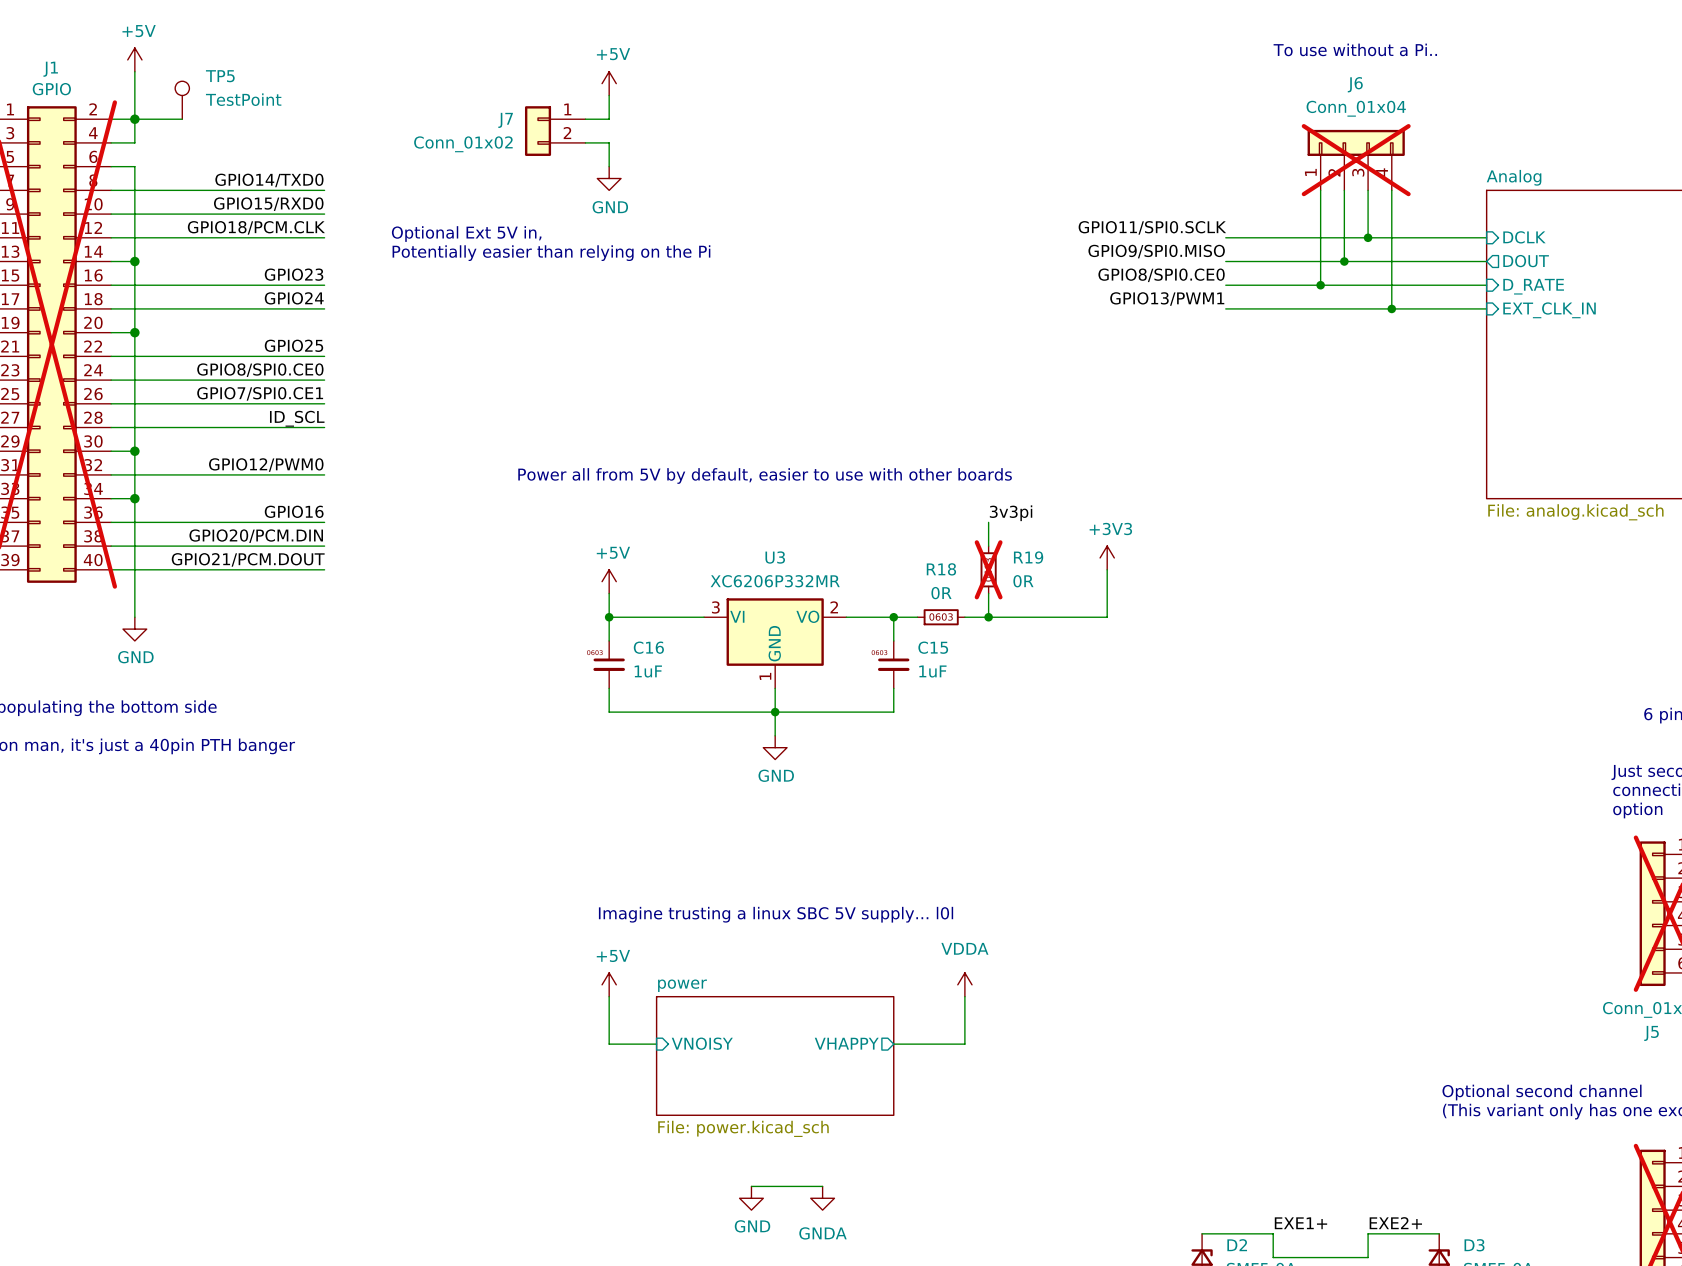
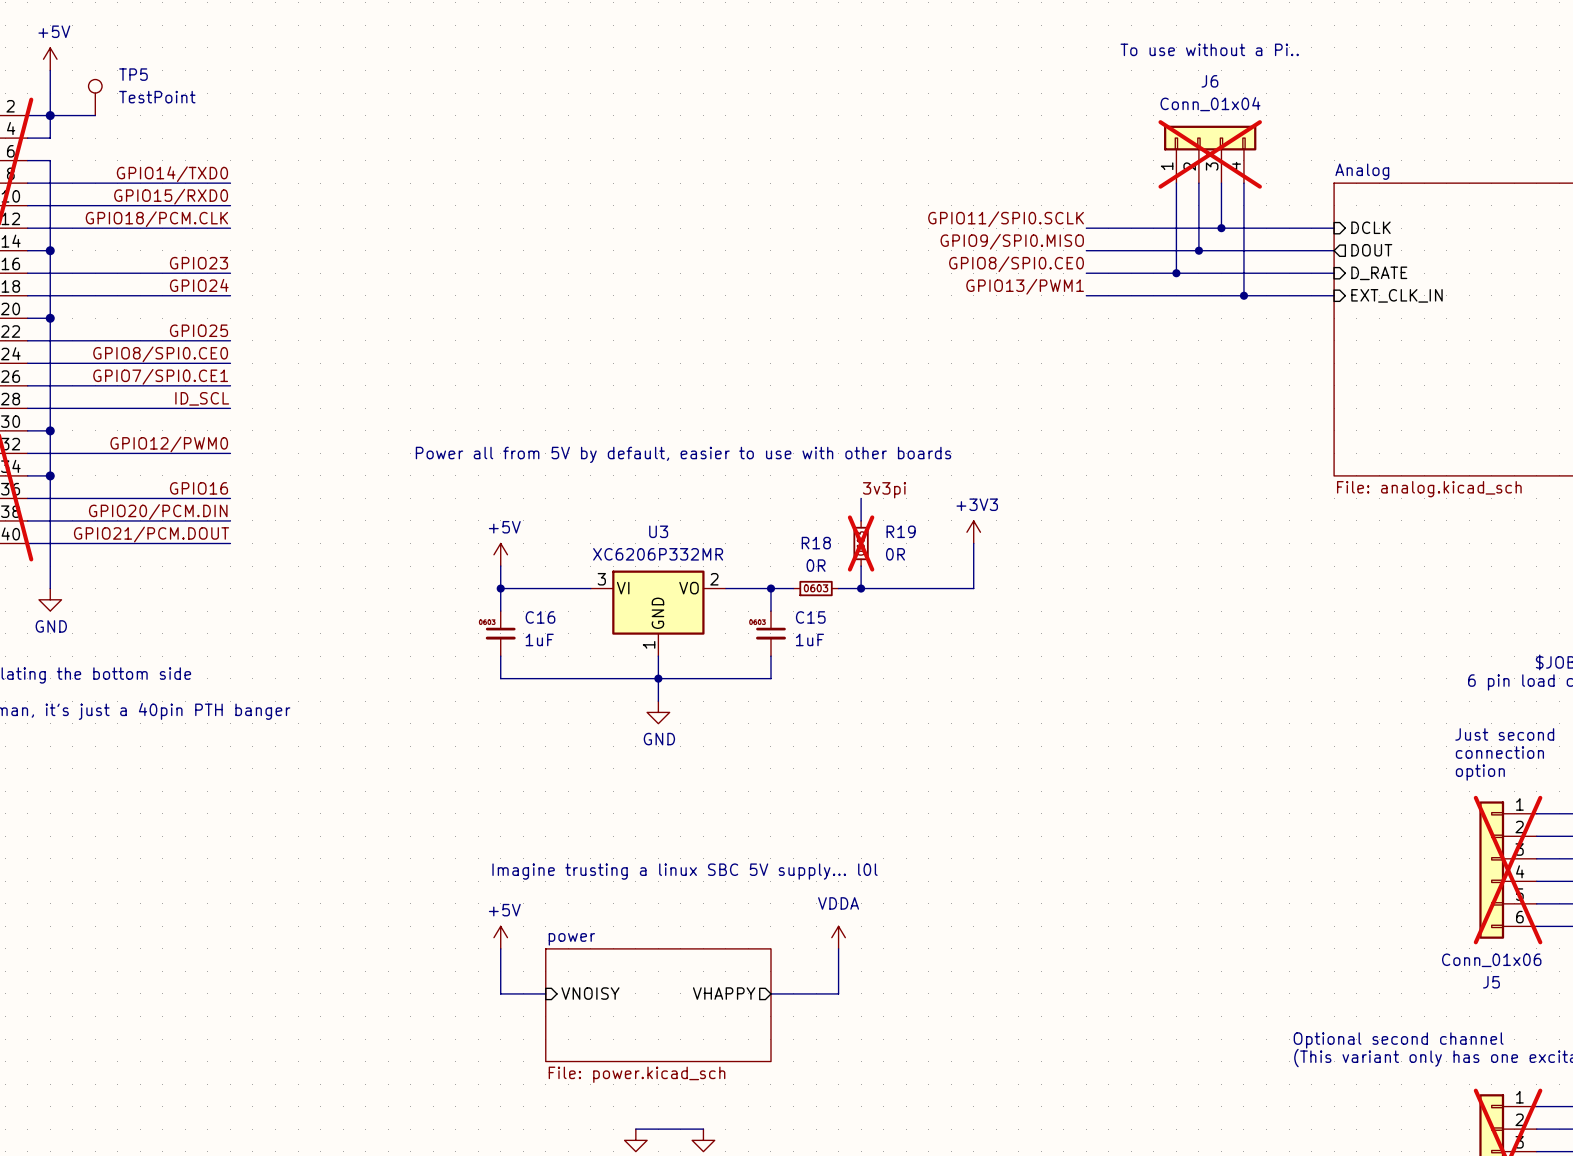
power symbol: +5V (609, 83) -> none
wire: (609, 95) (609, 119) (585, 119) -> none
J7: Conn_01x02 (555, 131) -> none
wire: (585, 142) (609, 142) (609, 166) -> none
power symbol: GND (609, 178) -> none
text: Optional Ext 5V in, (466, 234) -> none
text: Potentially easier than relying on the Pi (551, 253) -> none

